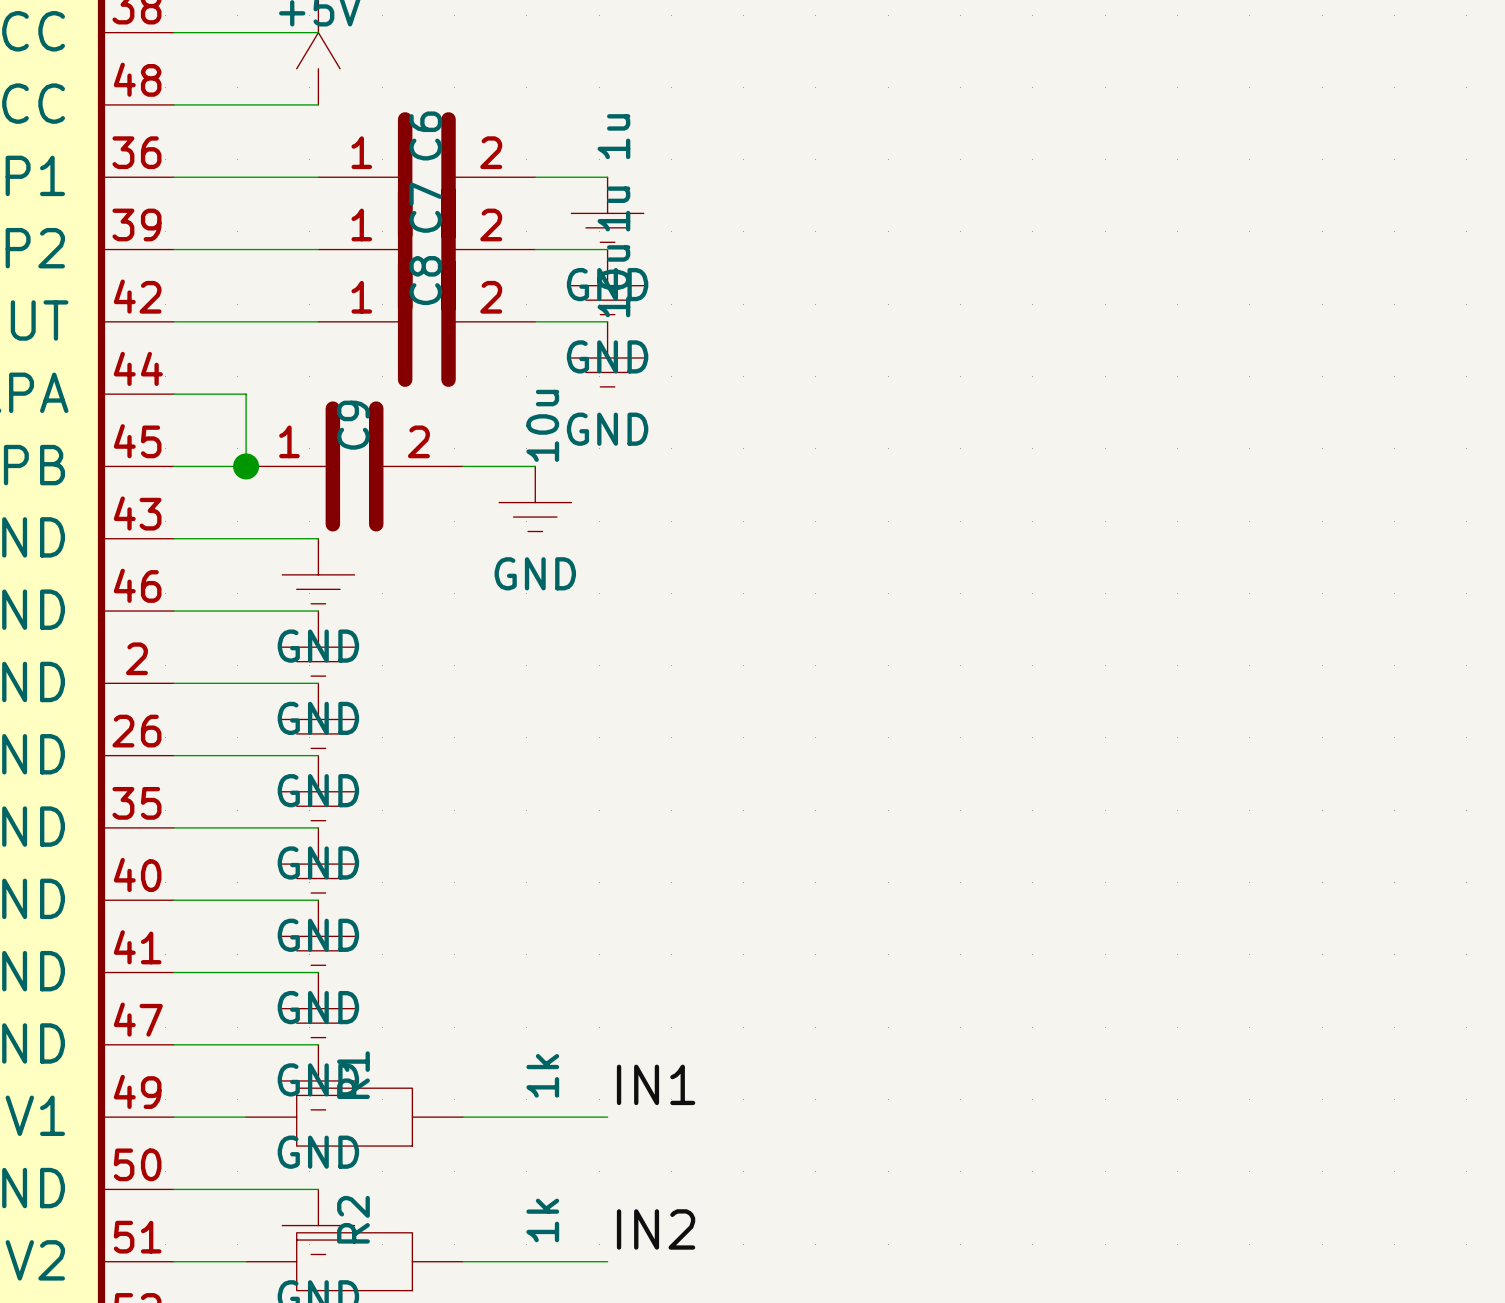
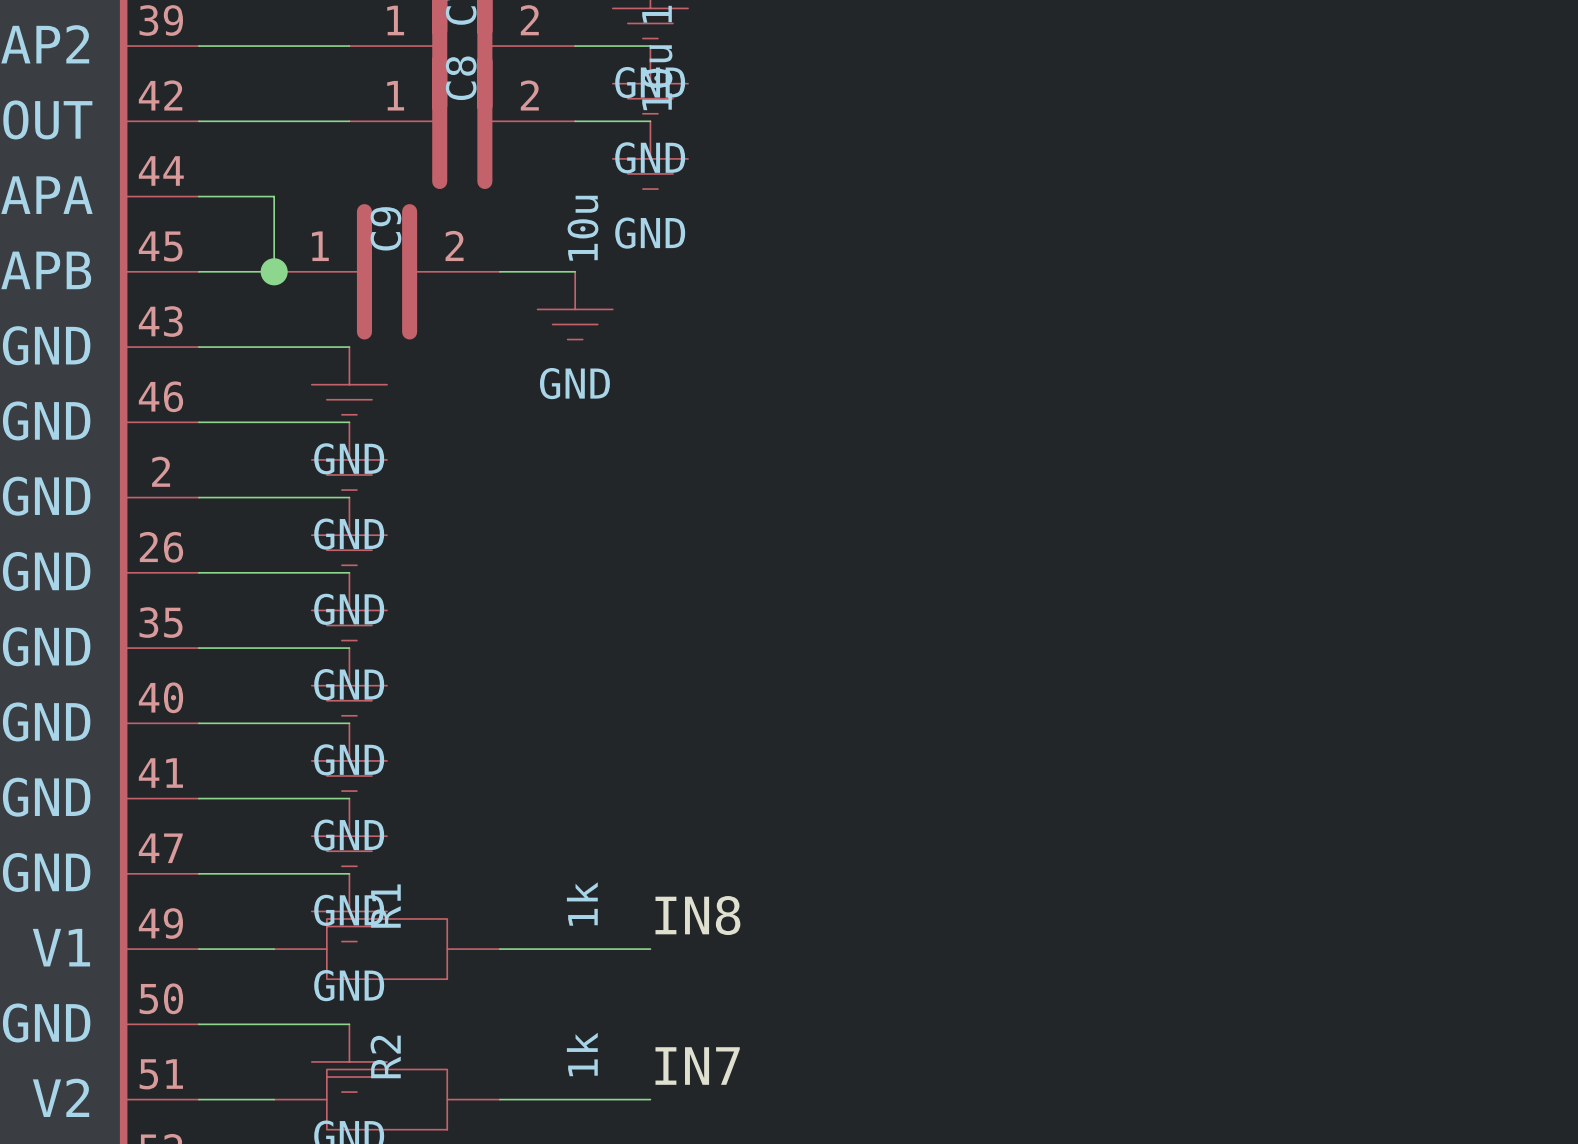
label: IN1 (656, 1084) -> IN8 (697, 915)
label: IN2 (656, 1229) -> IN7 (697, 1066)

